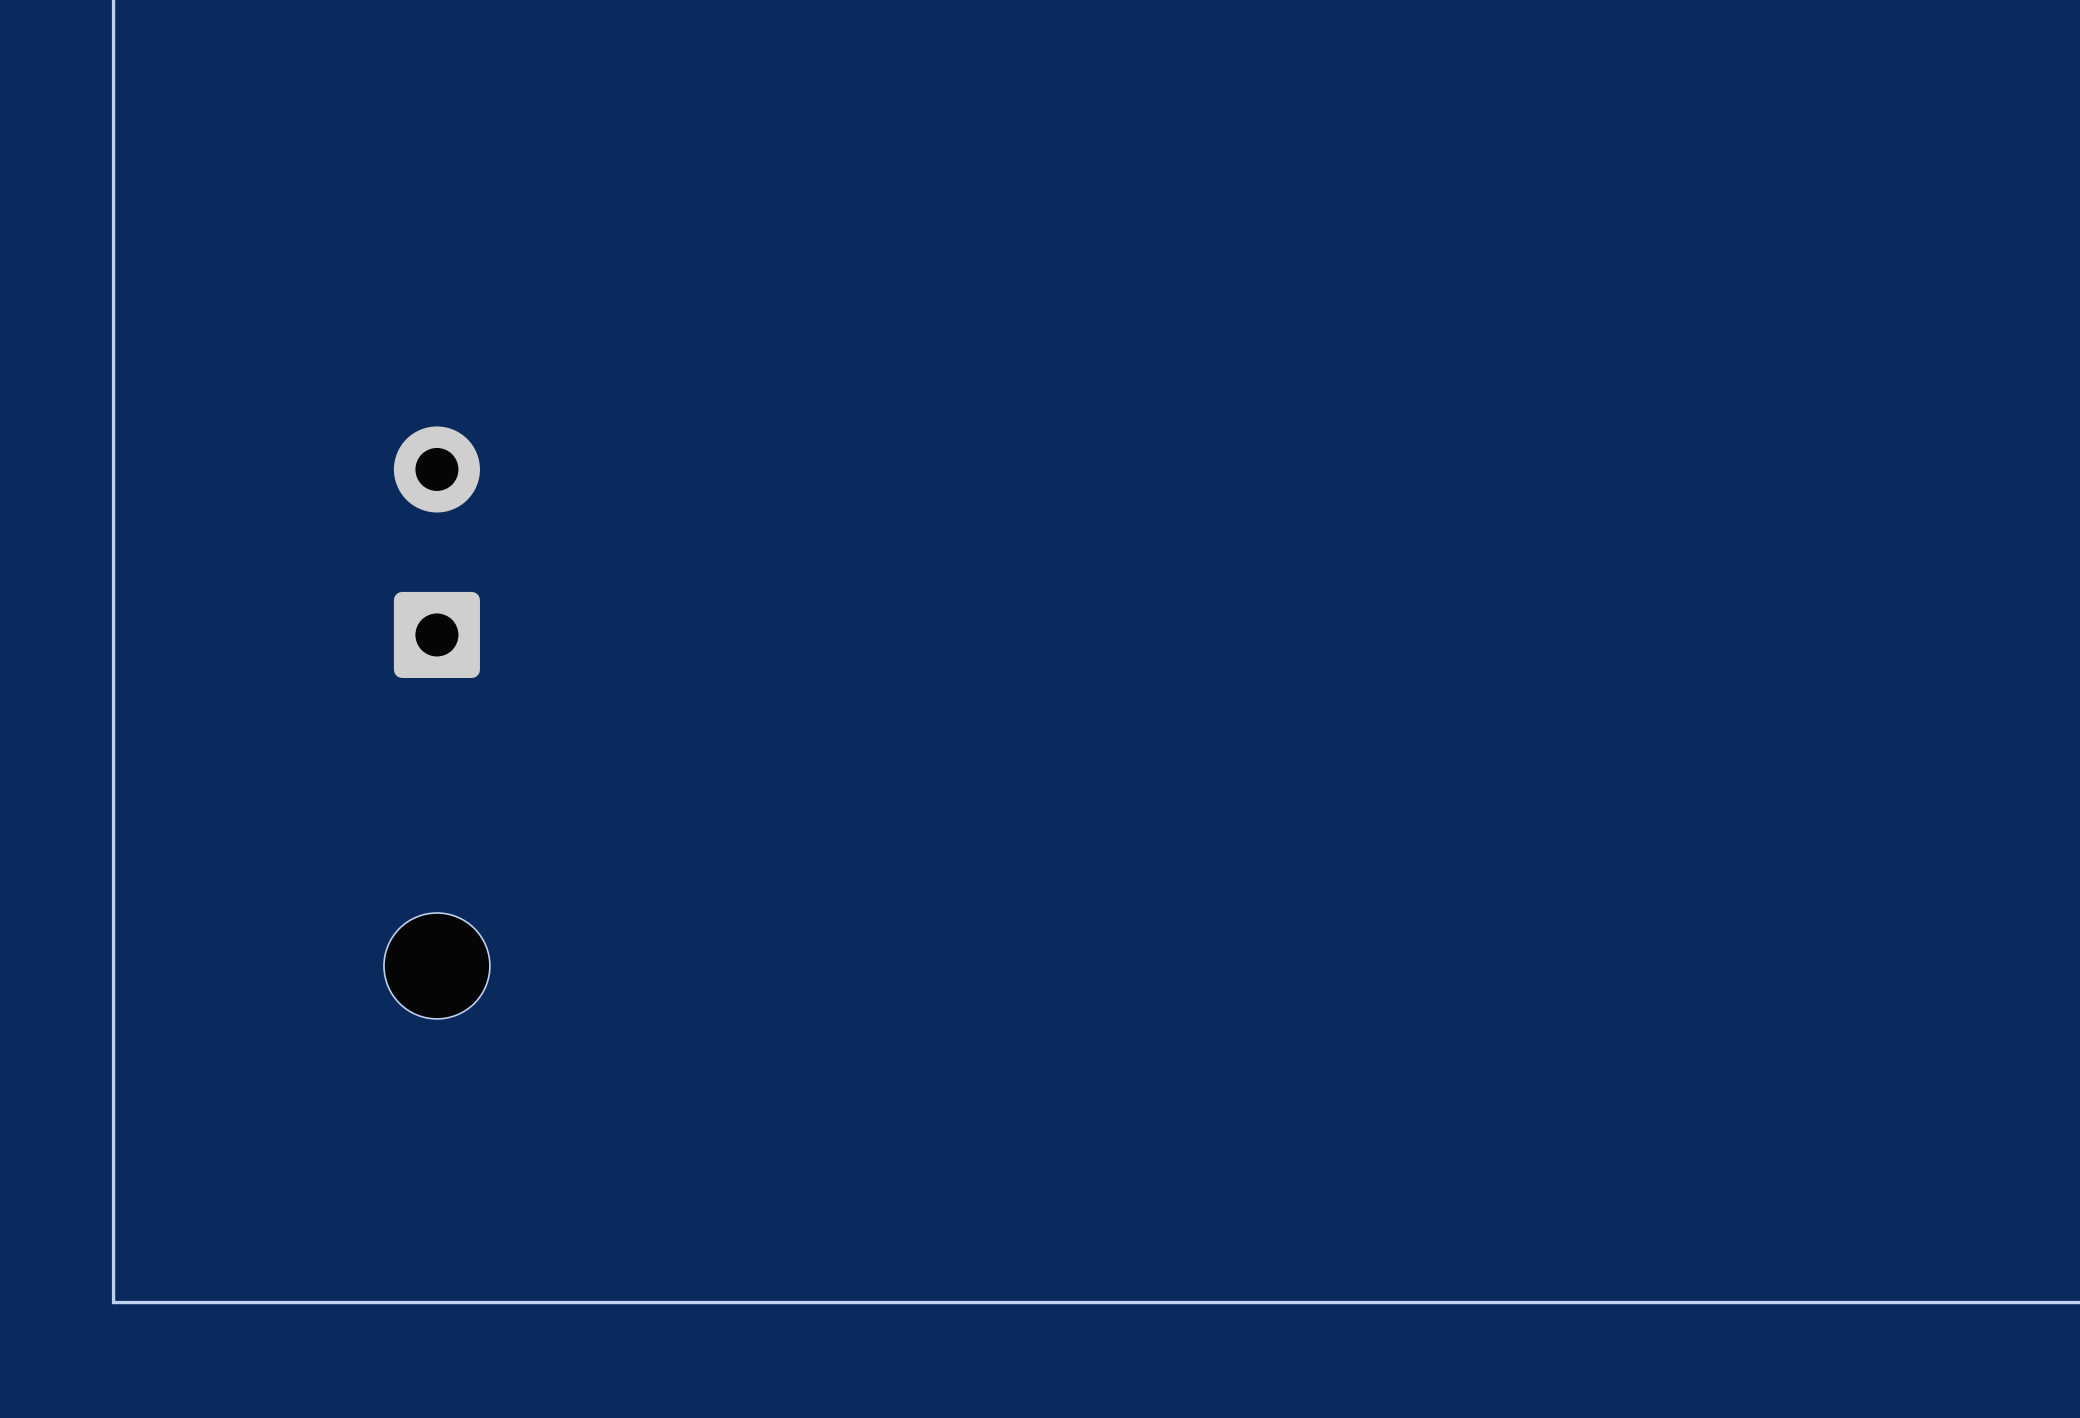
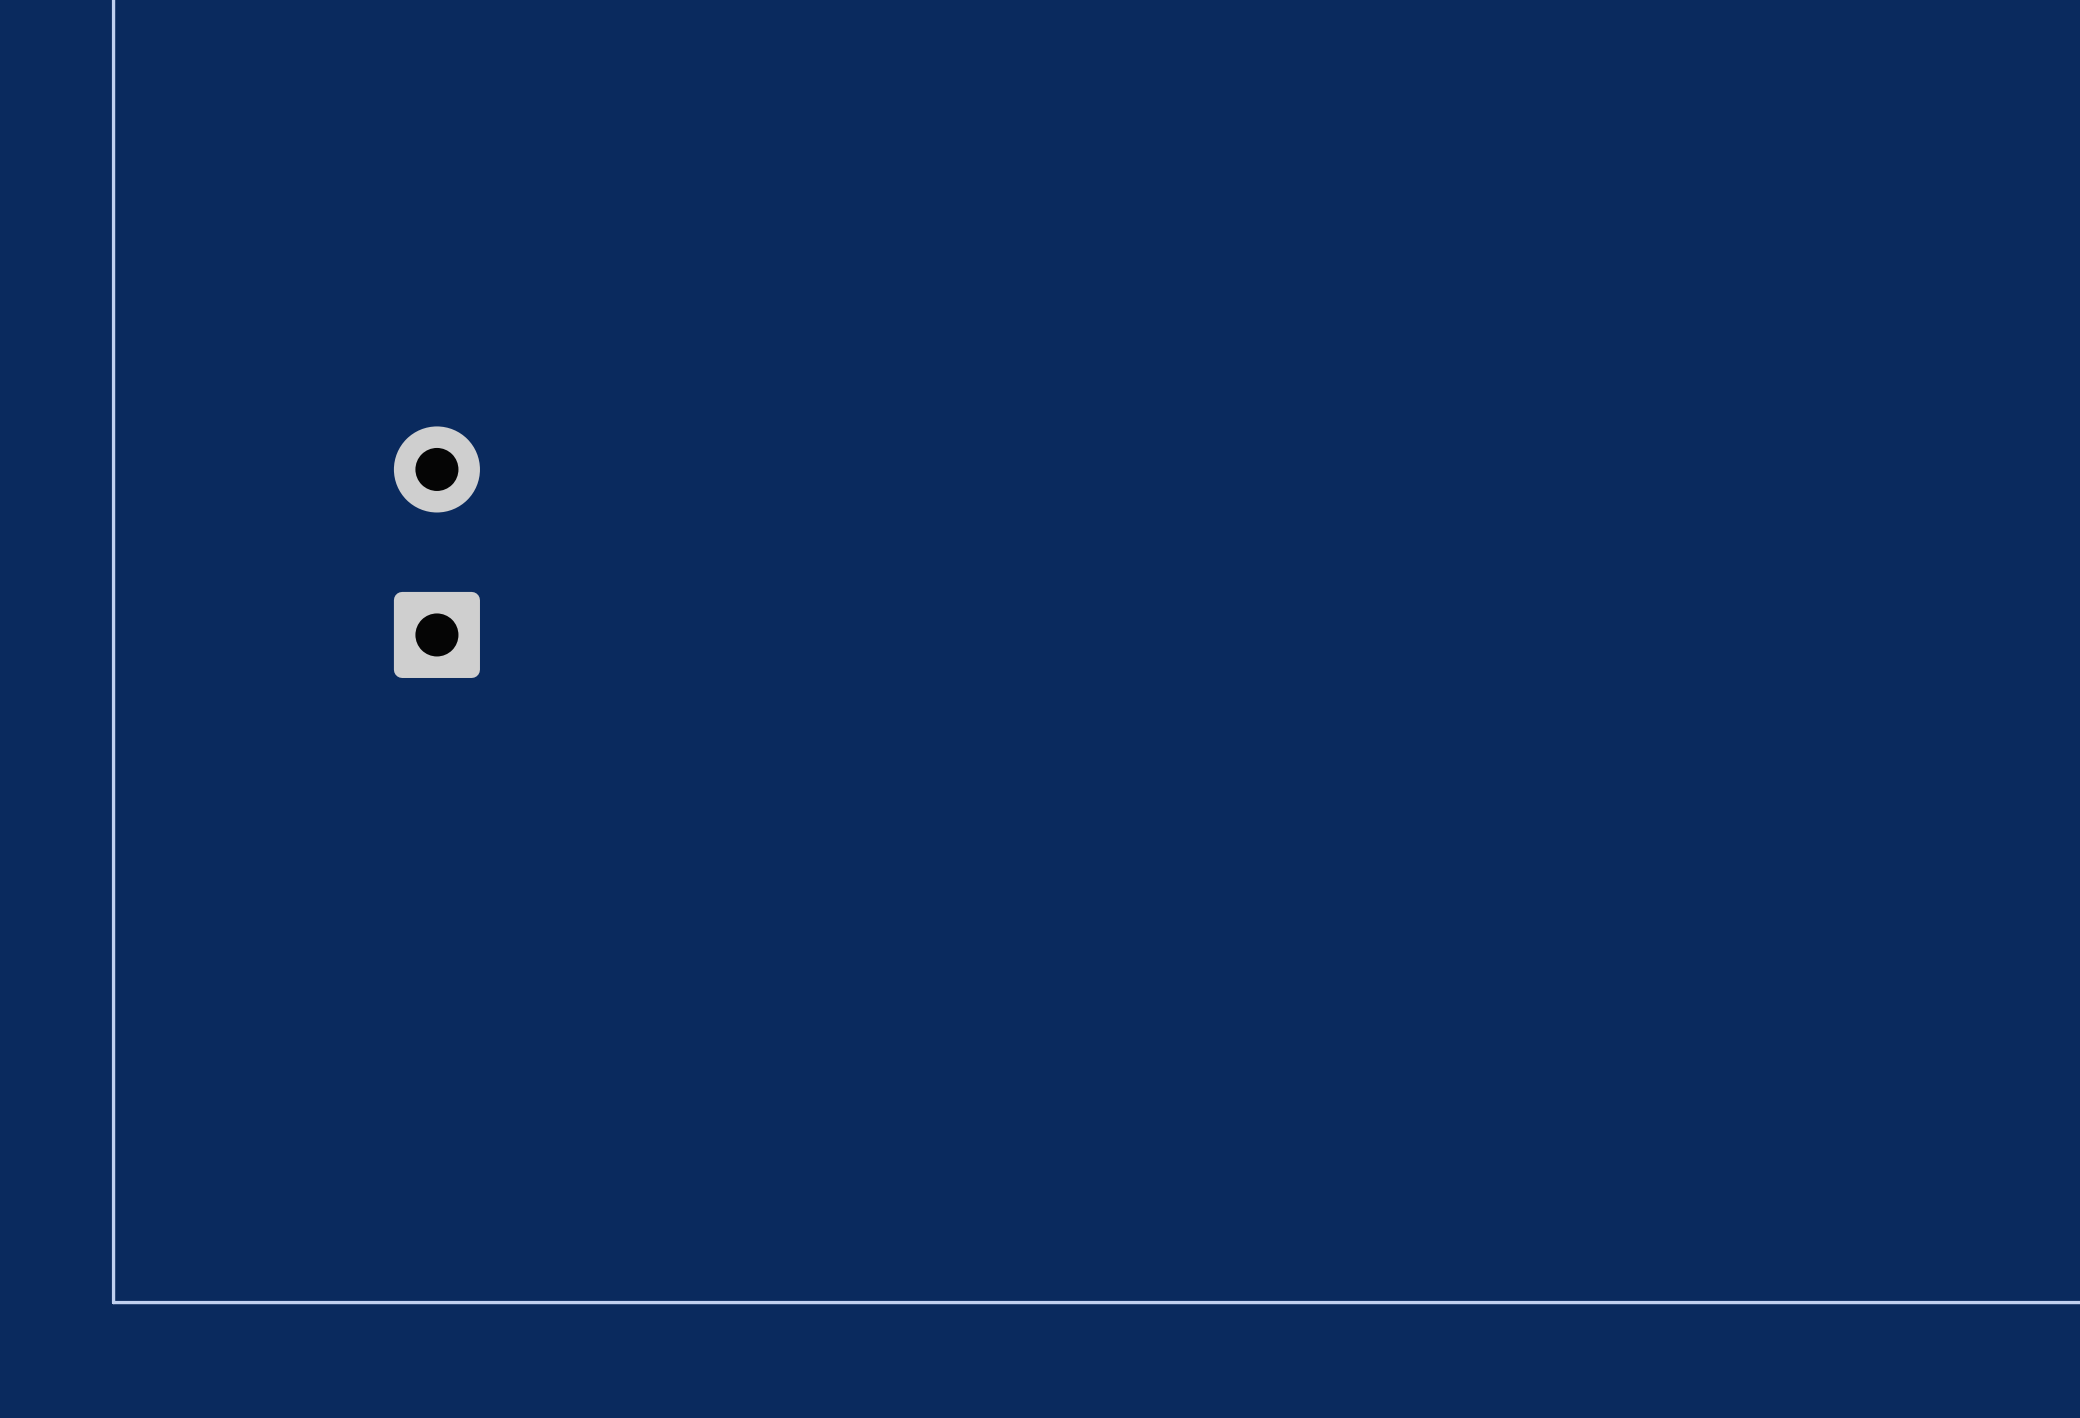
part: (436, 965) -> none

